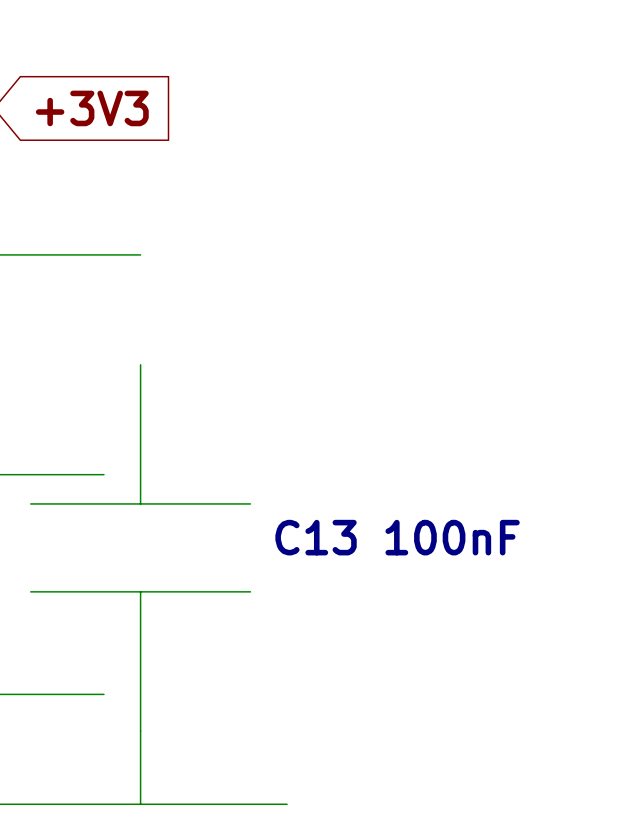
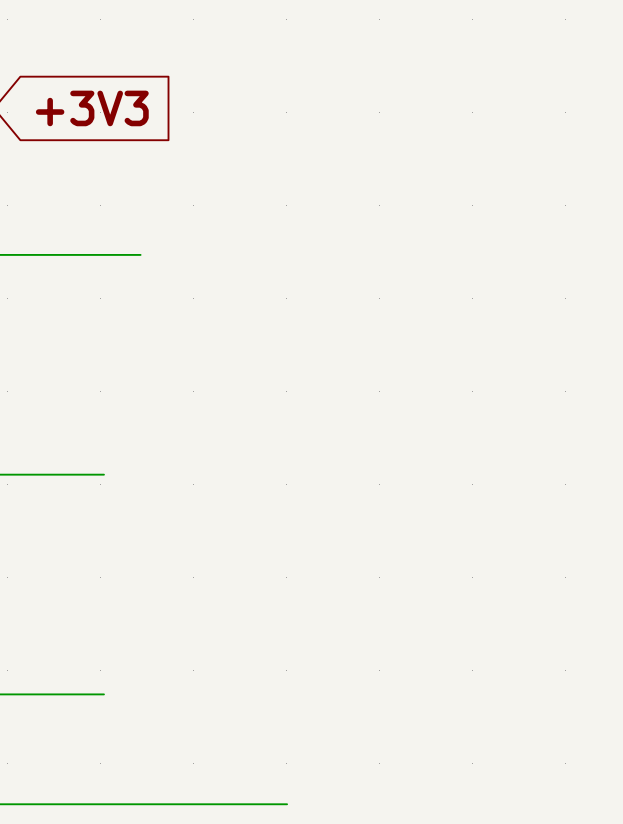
wire: (140, 364) (140, 503) -> none
wire: (30, 503) (250, 503) -> none
text: C13 100nF (397, 537) -> none
wire: (30, 591) (250, 591) -> none
wire: (140, 591) (140, 804) -> none

